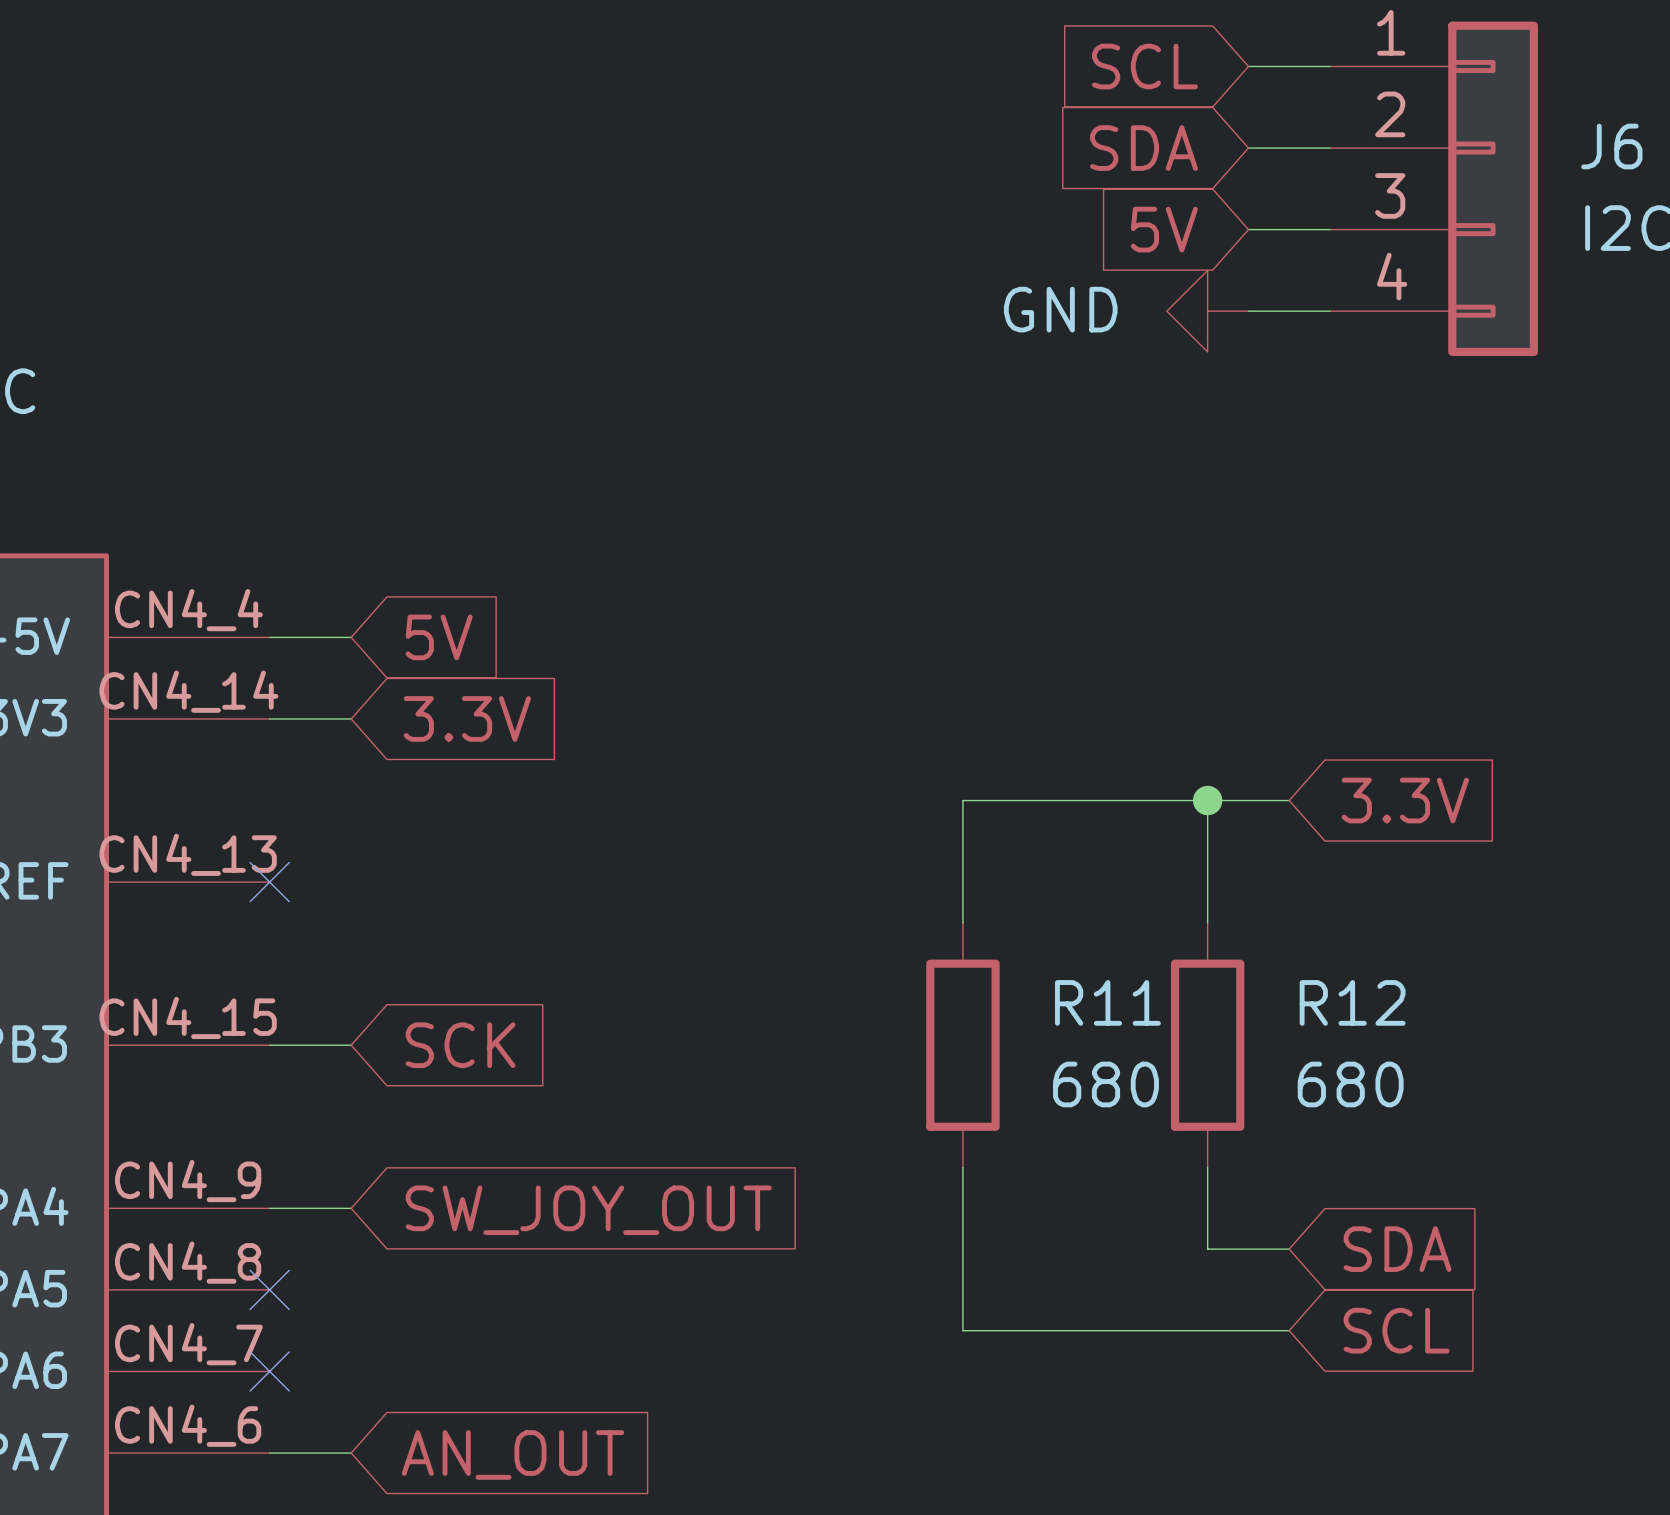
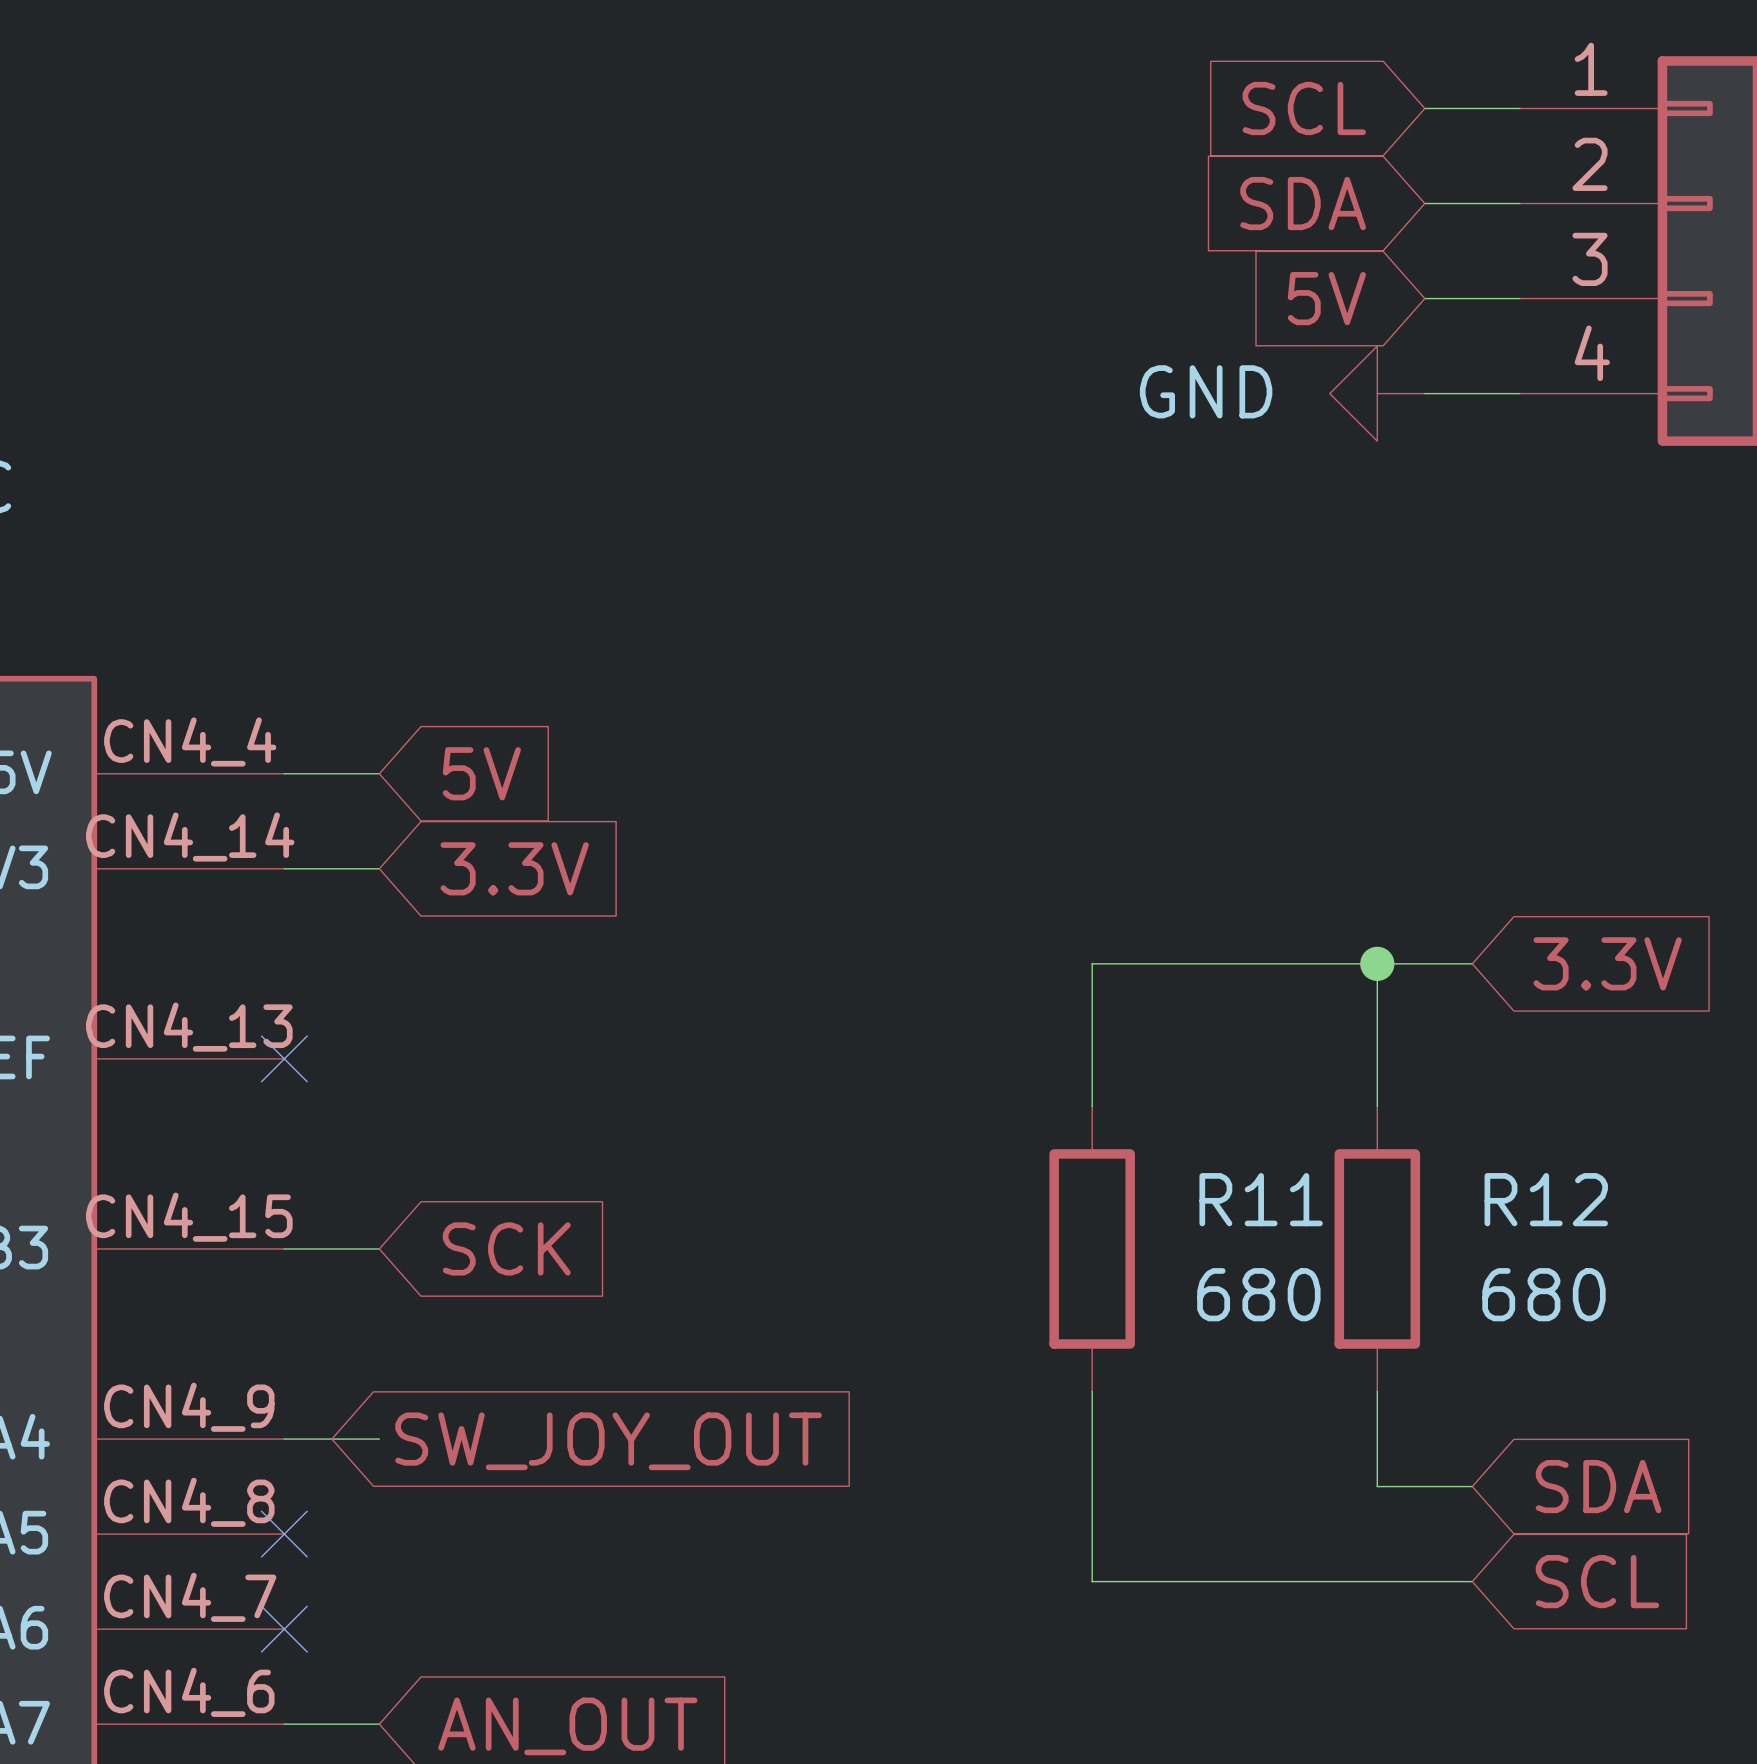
global label position: SW_JOY_OUT (588, 1210) -> SW_JOY_OUT (608, 1441)

